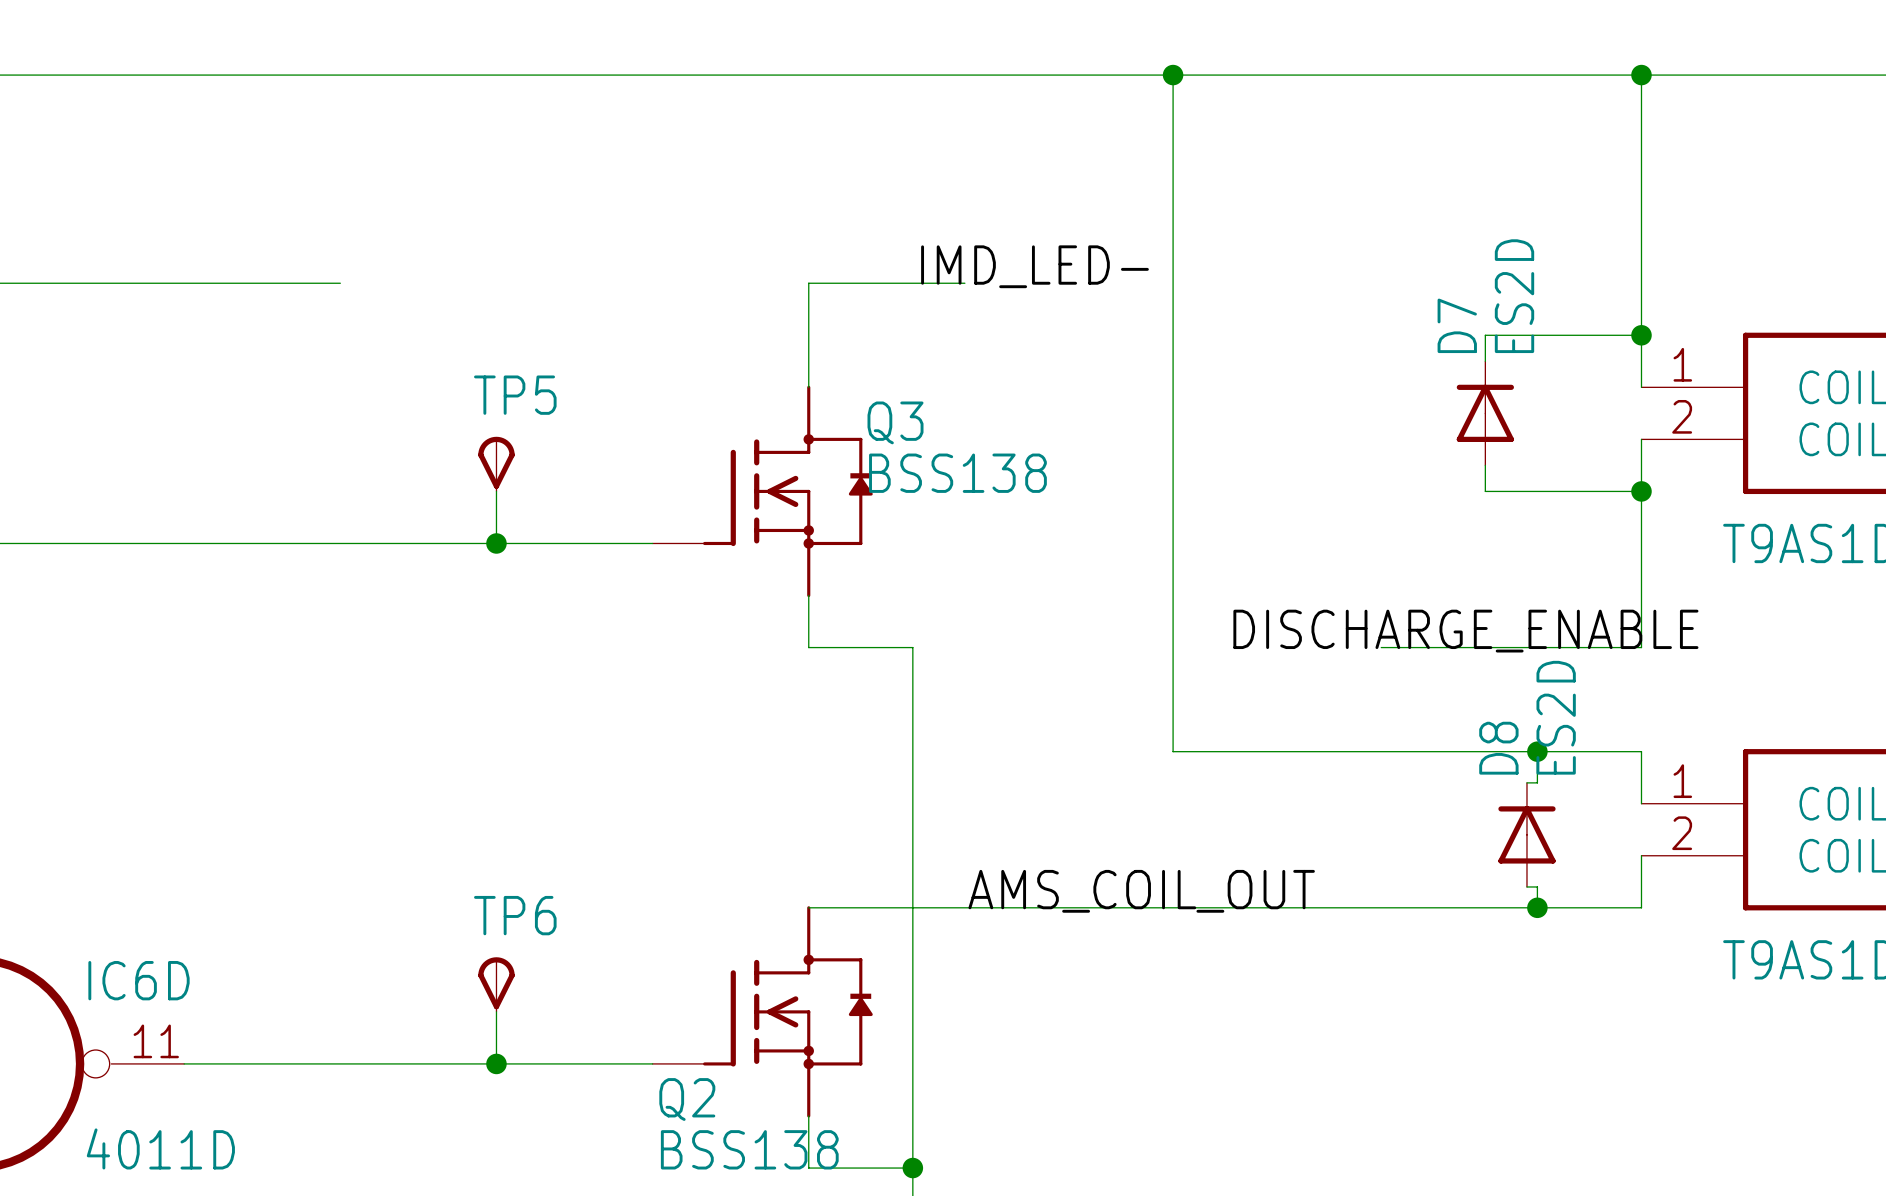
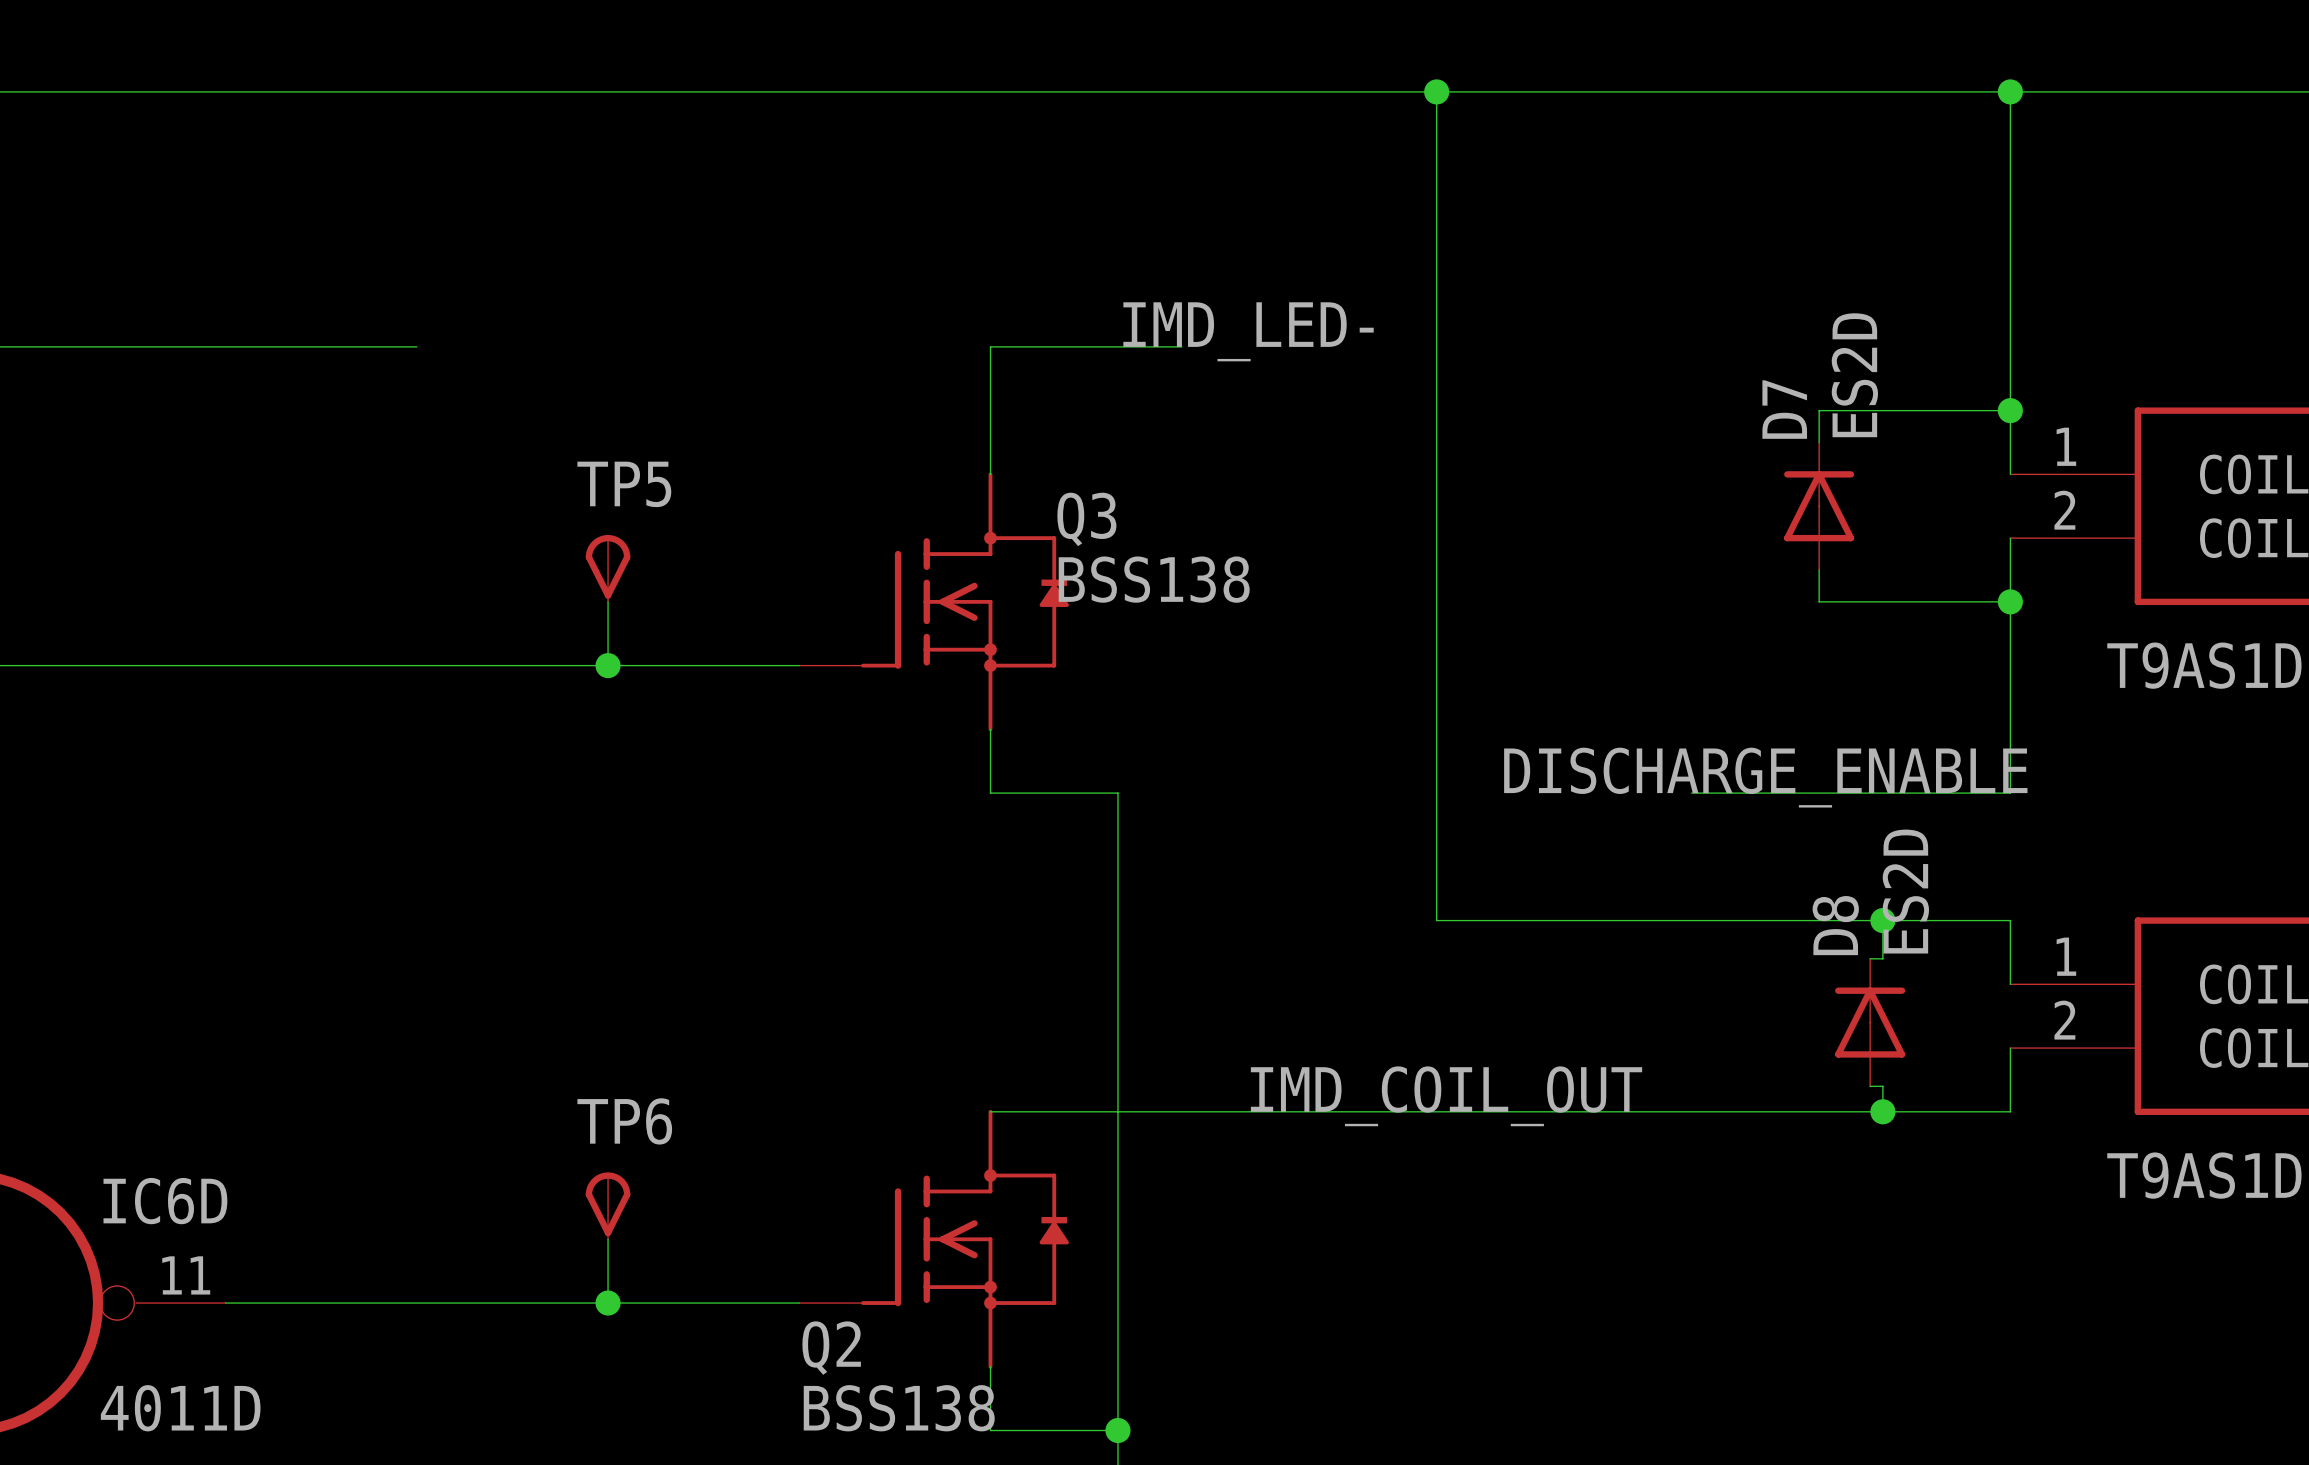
label: AMS_COIL_OUT (1141, 891) -> IMD_COIL_OUT (1446, 1096)

